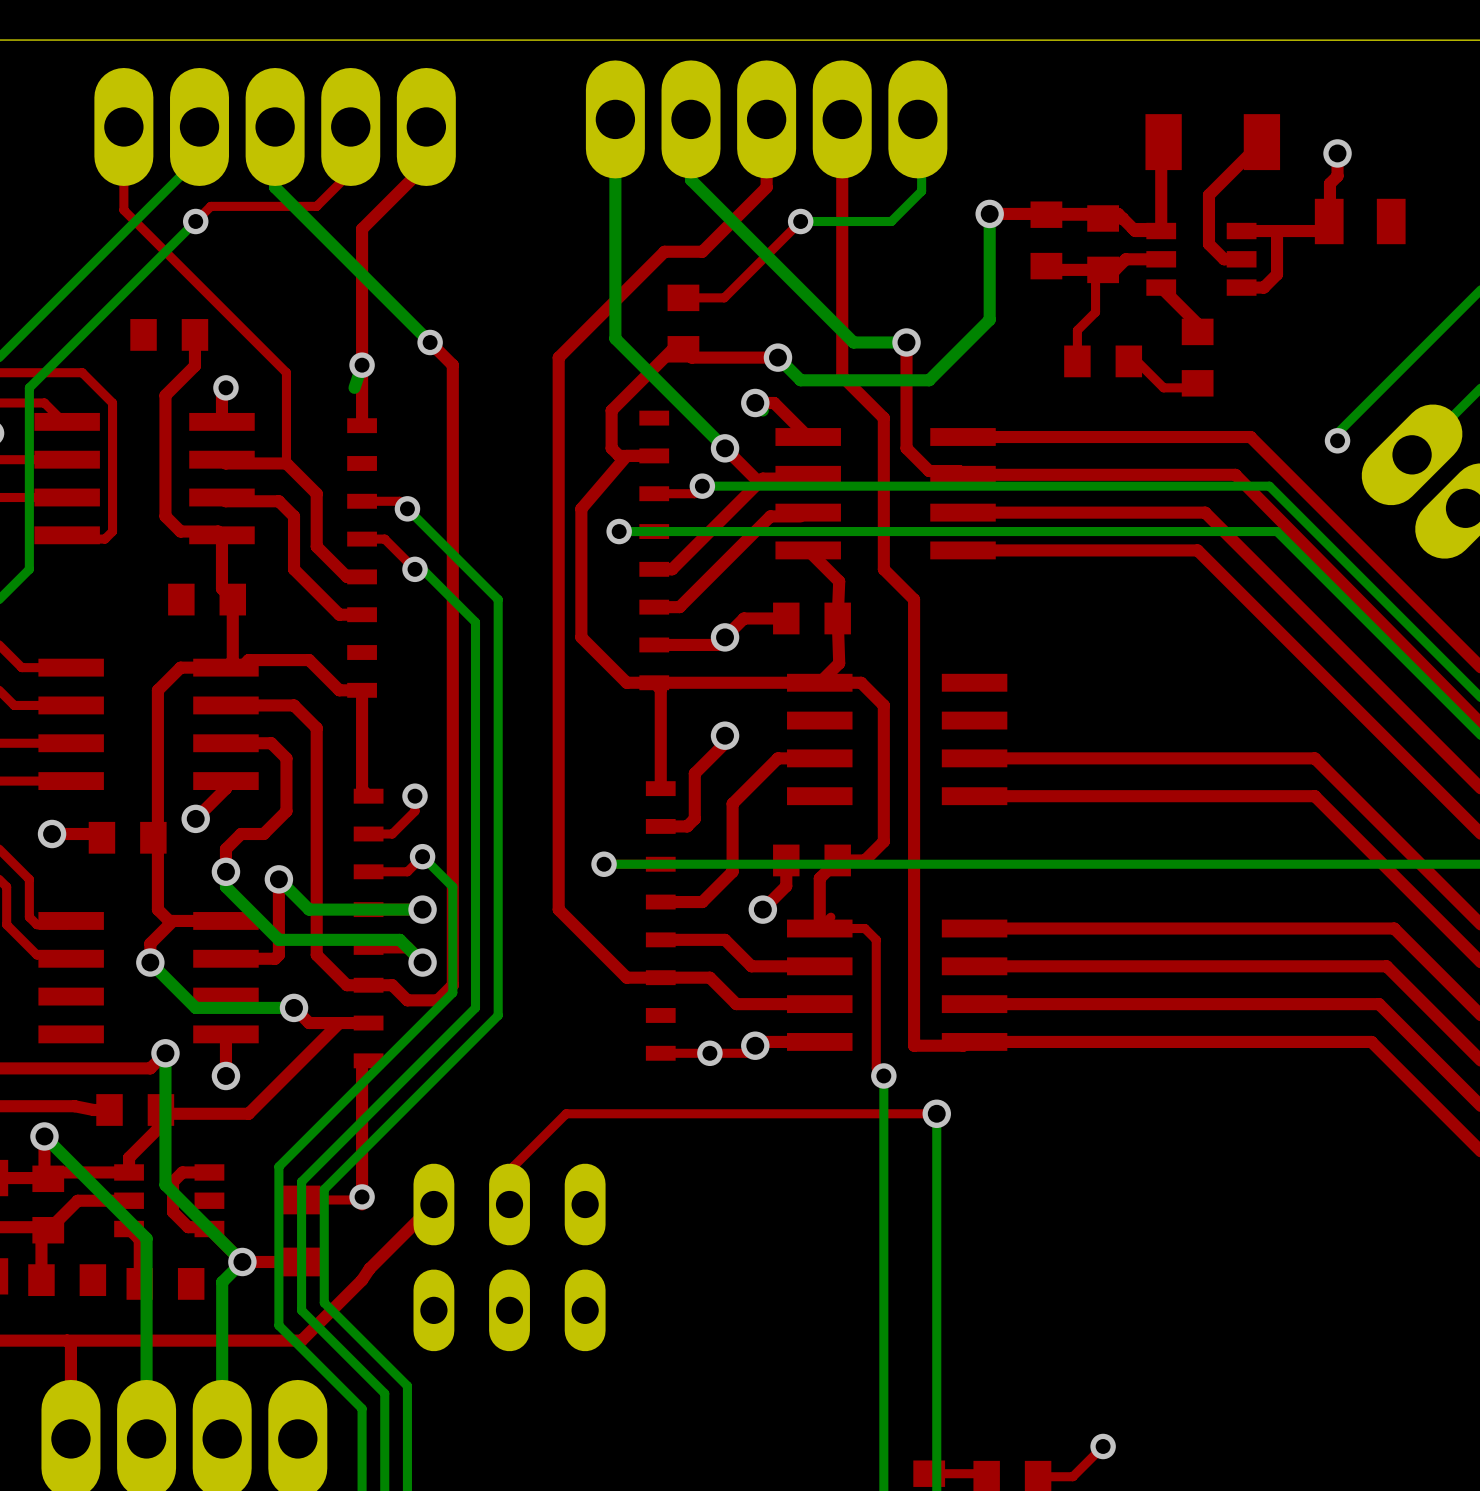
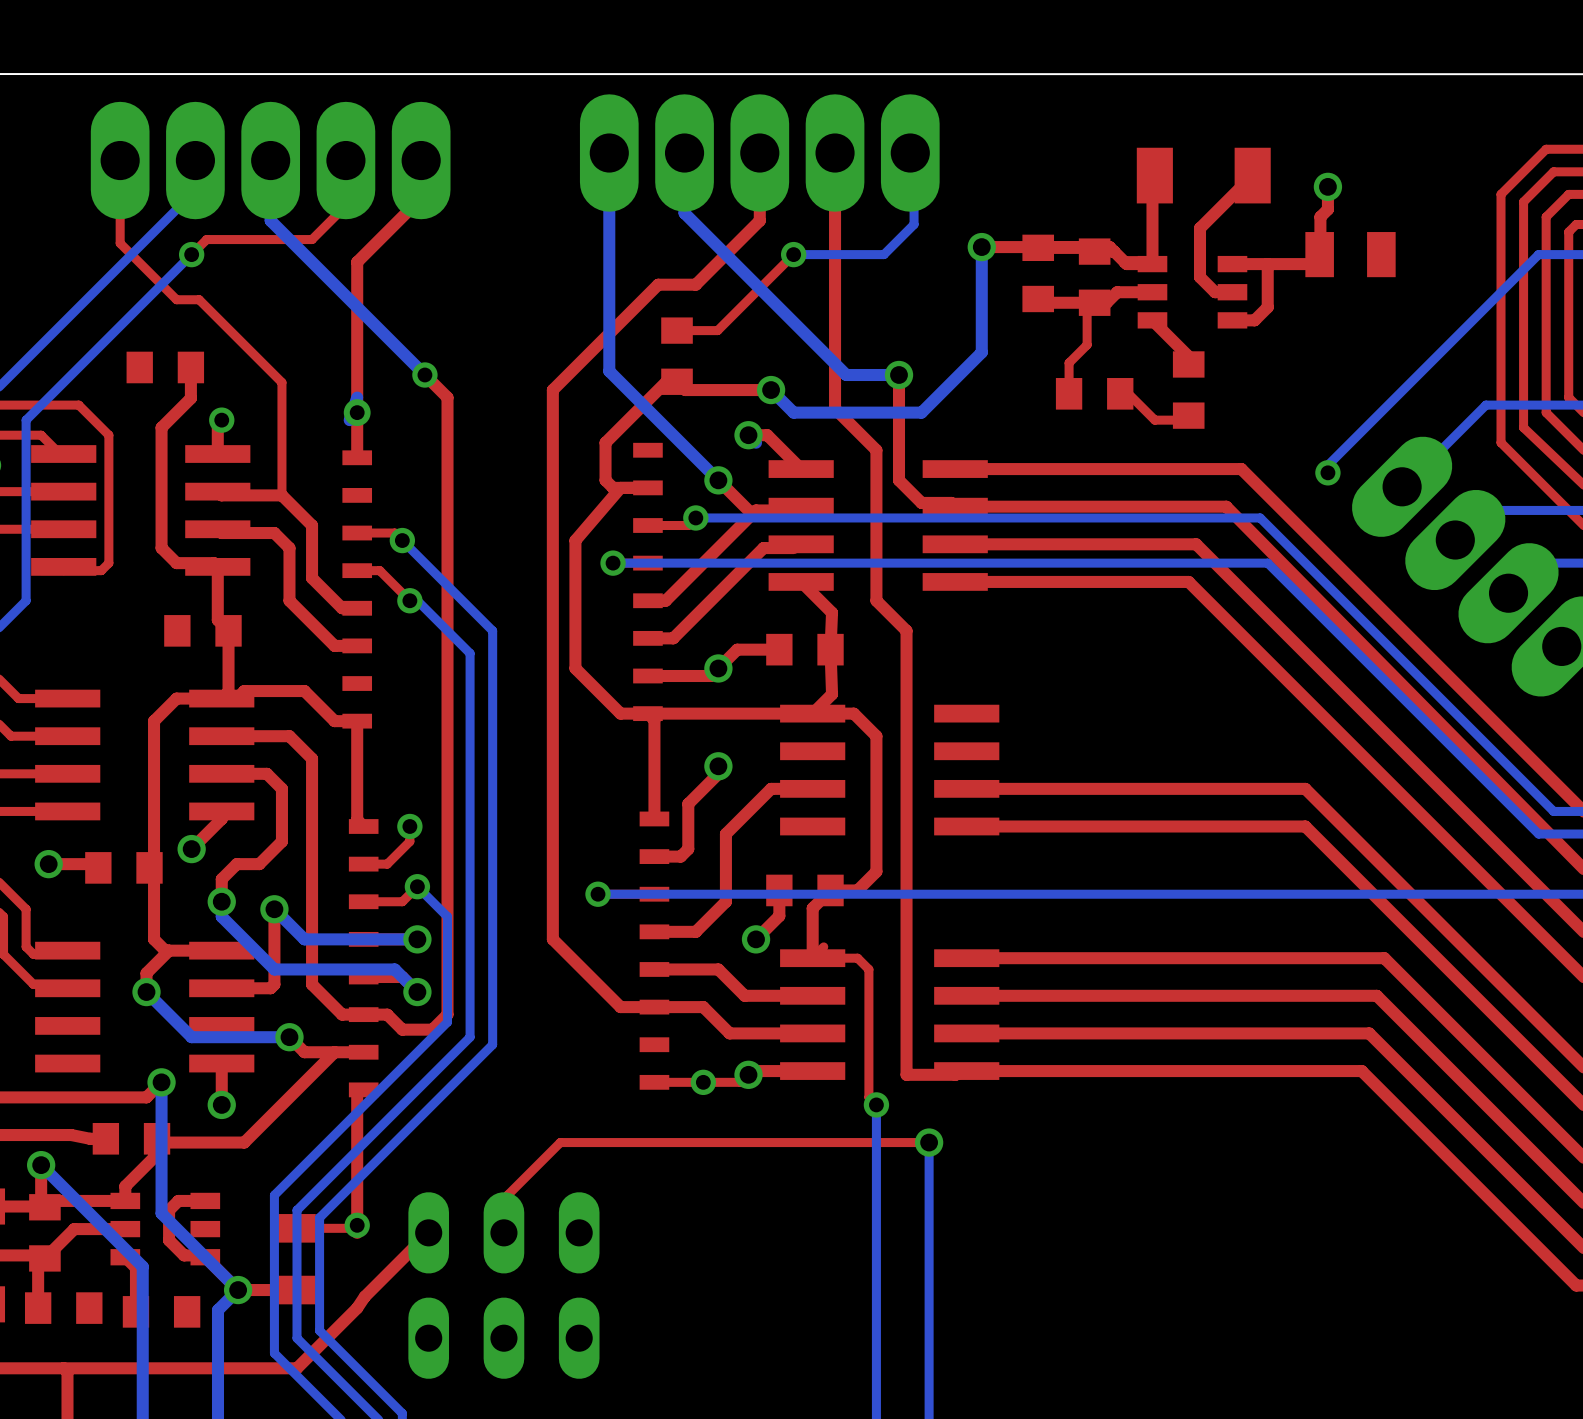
top track: (180, 266) (286, 372) -> (176, 299) (199, 299) (281, 382) (281, 405)
via position: (362, 365) -> (357, 412)

